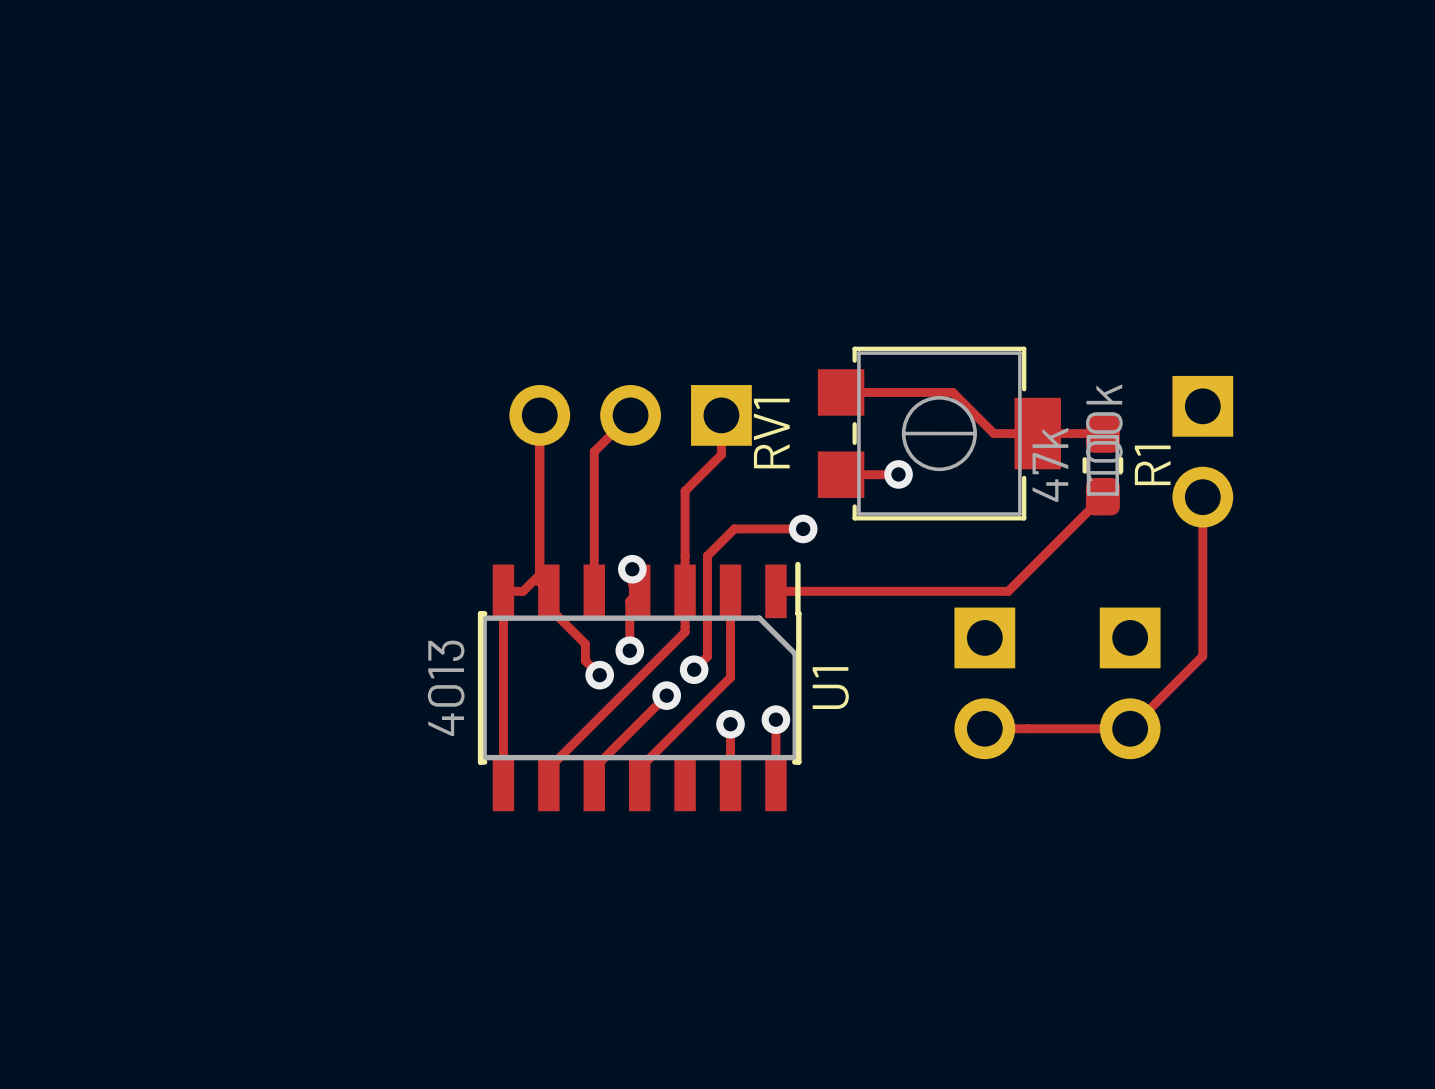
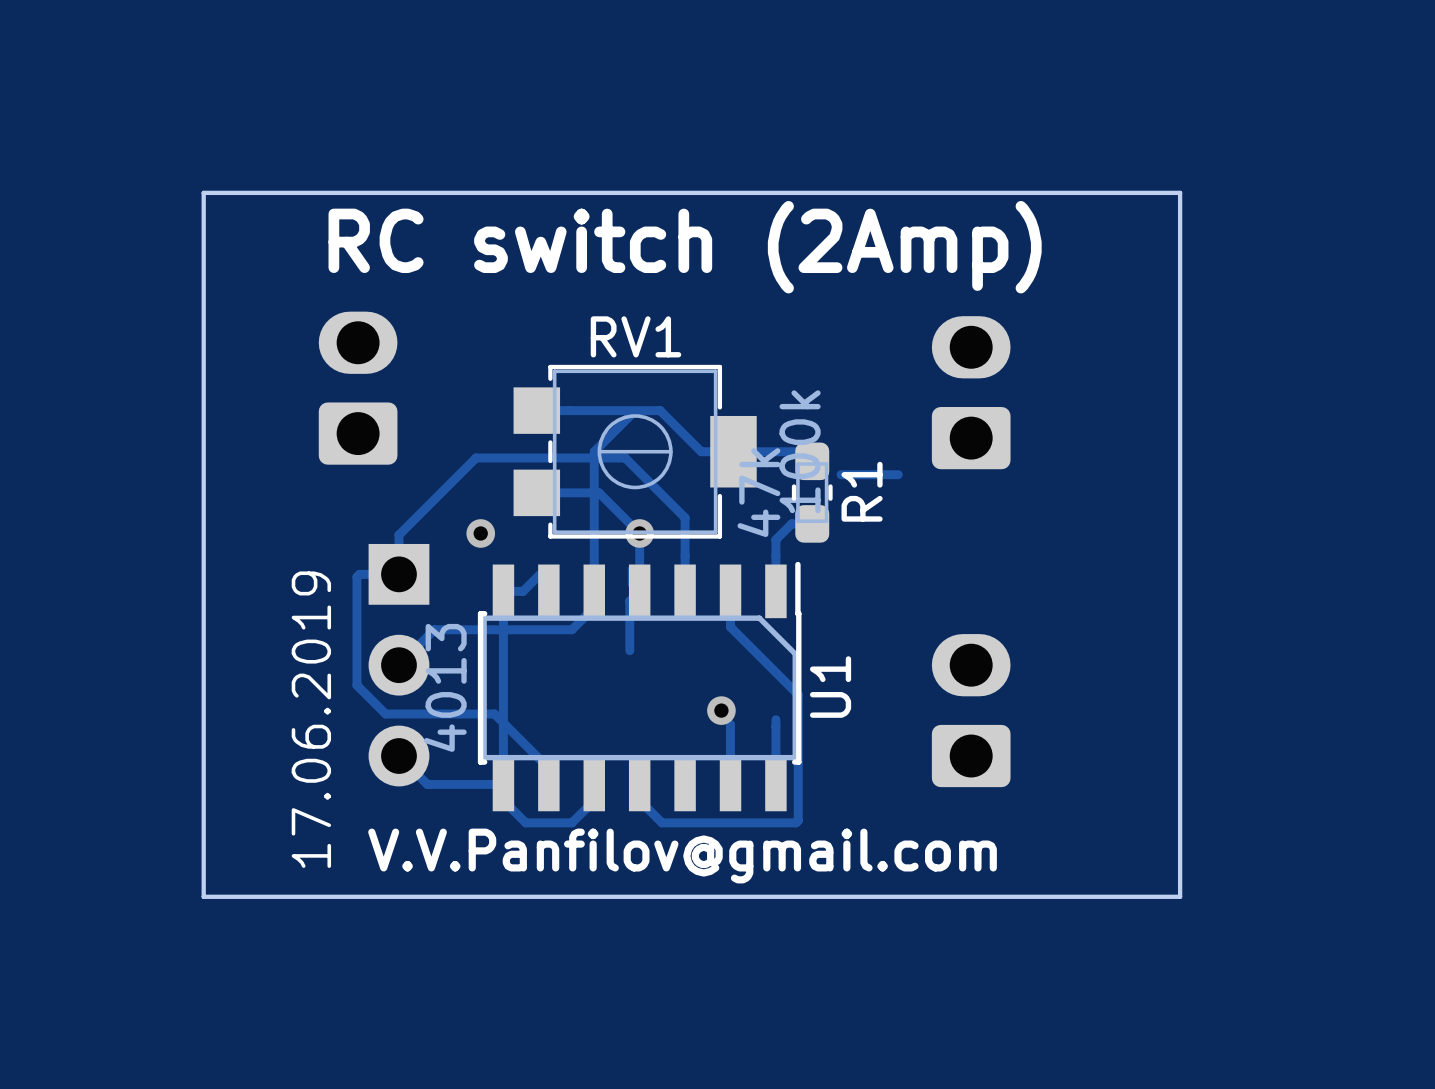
board edge: none -> (203, 192) (203, 896) (1180, 896) (1180, 192) (203, 192)
text: none -> RC switch (2Amp) (685, 247)
part: none -> (358, 388)
track: (841, 392) (952, 392) (993, 433) (1102, 433) -> none
part: none -> (971, 392)
track: none -> (536, 410) (660, 410) (701, 451) (802, 451) (812, 461)
track: (539, 415) (539, 582) (548, 591) (548, 607) (585, 643) (585, 660) (599, 675) -> none
part rotation: 0° (630, 415) -> 90° counterclockwise (398, 665)
part position: (630, 415) -> (398, 665)
track: (721, 415) (721, 454) (685, 491) (685, 517) -> none
RV1 name rotation: 0° (771, 433) -> 90° clockwise (635, 336)
RV1 name position: RV1 (771, 433) -> RV1 (635, 336)
RV1 position: (939, 433) -> (635, 451)
part: (1202, 451) -> none
R1 position: (1102, 465) -> (812, 492)
via: (898, 474) -> none
track: none -> (536, 492) (599, 492) (639, 533) (639, 591)
track: (1102, 496) (1008, 591) (775, 591) -> (812, 523) (791, 523) (775, 539) (775, 591)
track: (1202, 497) (1202, 656) (1130, 728) (984, 728) -> none
track: (803, 528) (734, 528) (707, 555) (707, 656) (694, 669) -> none
via: (803, 528) -> none
via: none -> (480, 533)
via position: (632, 569) -> (639, 533)
track: (685, 591) (685, 632) (548, 768) -> (685, 517) (625, 458) (476, 458) (398, 535) (398, 574) (359, 574) (356, 577) (356, 685) (385, 713) (494, 713) (548, 768)
track: none -> (594, 607) (571, 629) (434, 629) (398, 665)
part footprint: [954, 607, 1016, 760] -> [931, 634, 1011, 788]
track: (730, 627) (730, 677) (639, 768) (639, 784) -> (730, 627) (798, 694) (798, 820) (795, 822) (662, 822) (639, 800) (639, 784)
via: (629, 650) -> none
via: (694, 669) -> none
via: (599, 675) -> none
part: (1130, 683) -> none
track: (666, 695) (594, 768) (594, 784) -> (398, 756) (427, 784) (503, 784) (503, 800) (525, 822) (571, 822) (594, 800) (594, 784)
via: (666, 695) -> none
text: none -> 17.06.2019 (311, 719)
via: (775, 719) -> none
via position: (730, 724) -> (721, 710)
text: none -> V.V.Panfilov@gmail.com (682, 856)

